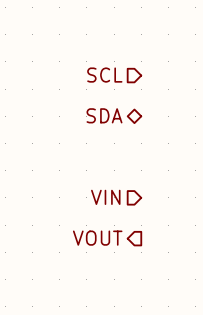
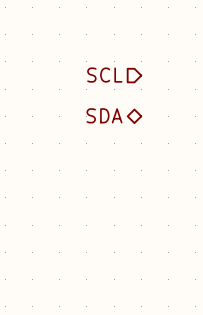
hierarchical label: VIN (105, 197) -> none
hierarchical label: VOUT (97, 238) -> none

